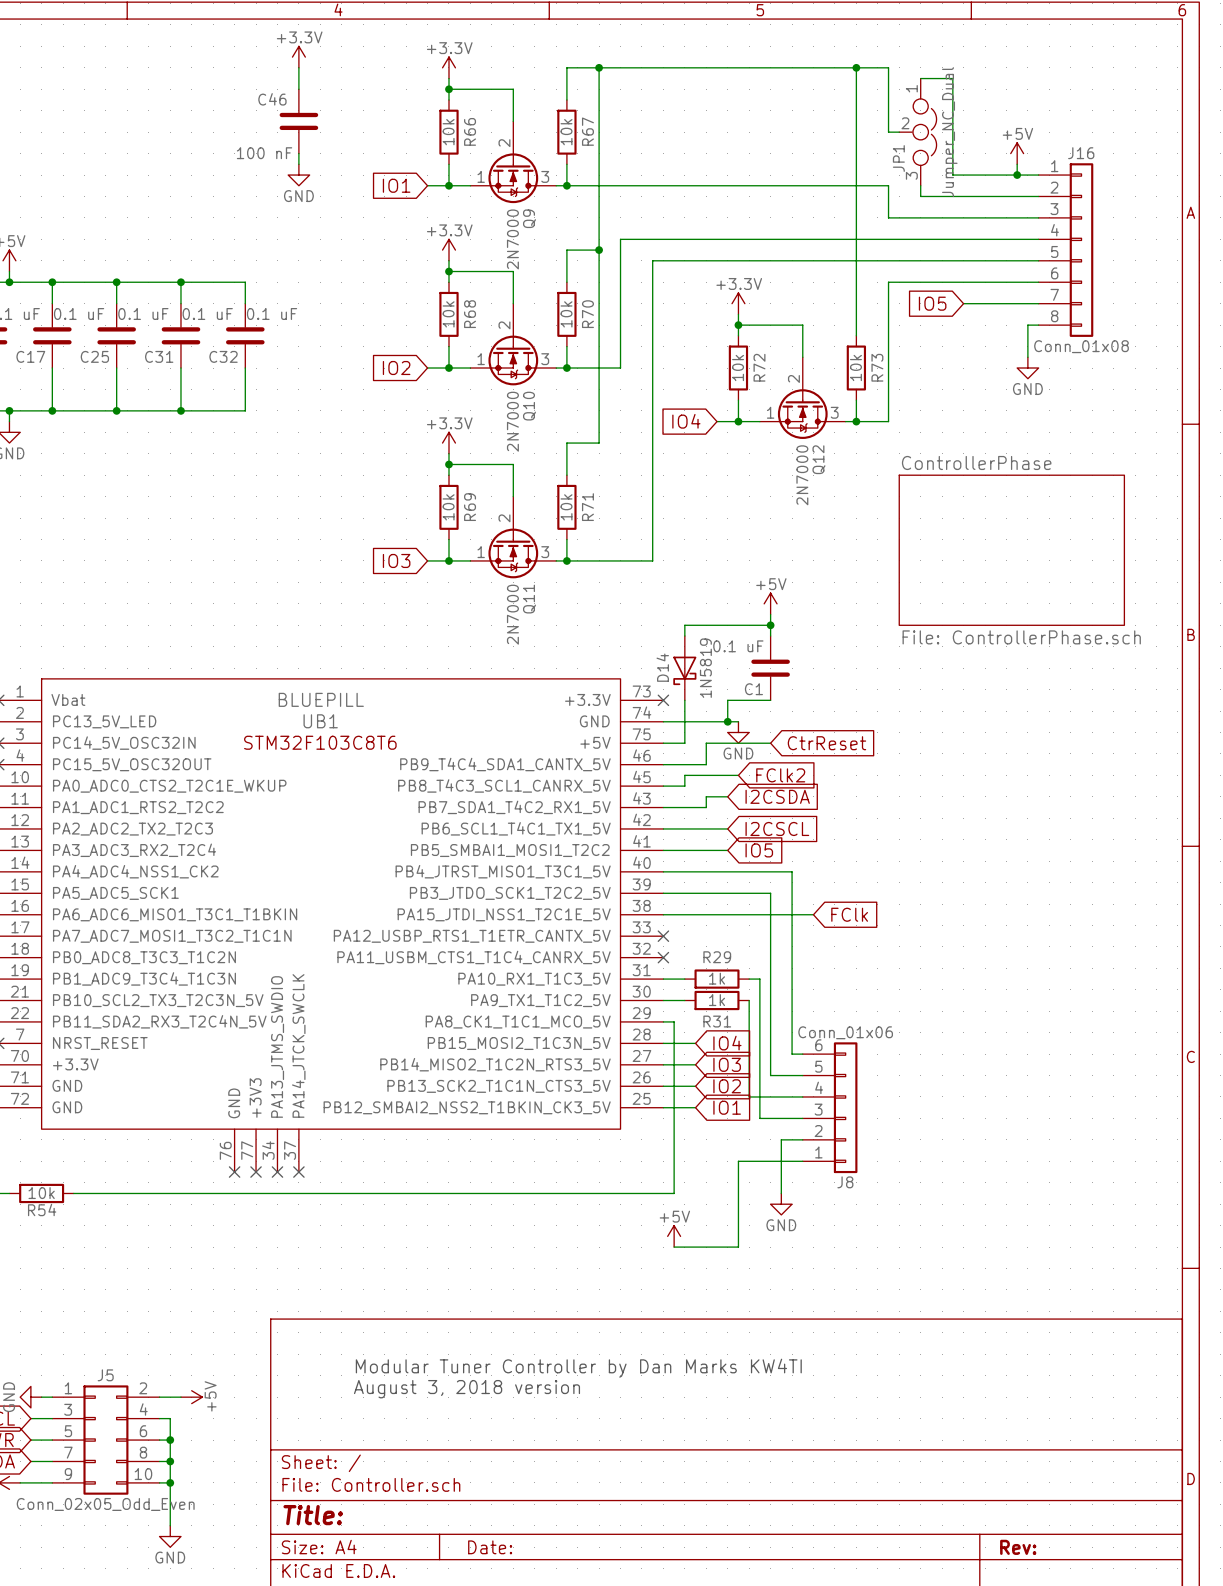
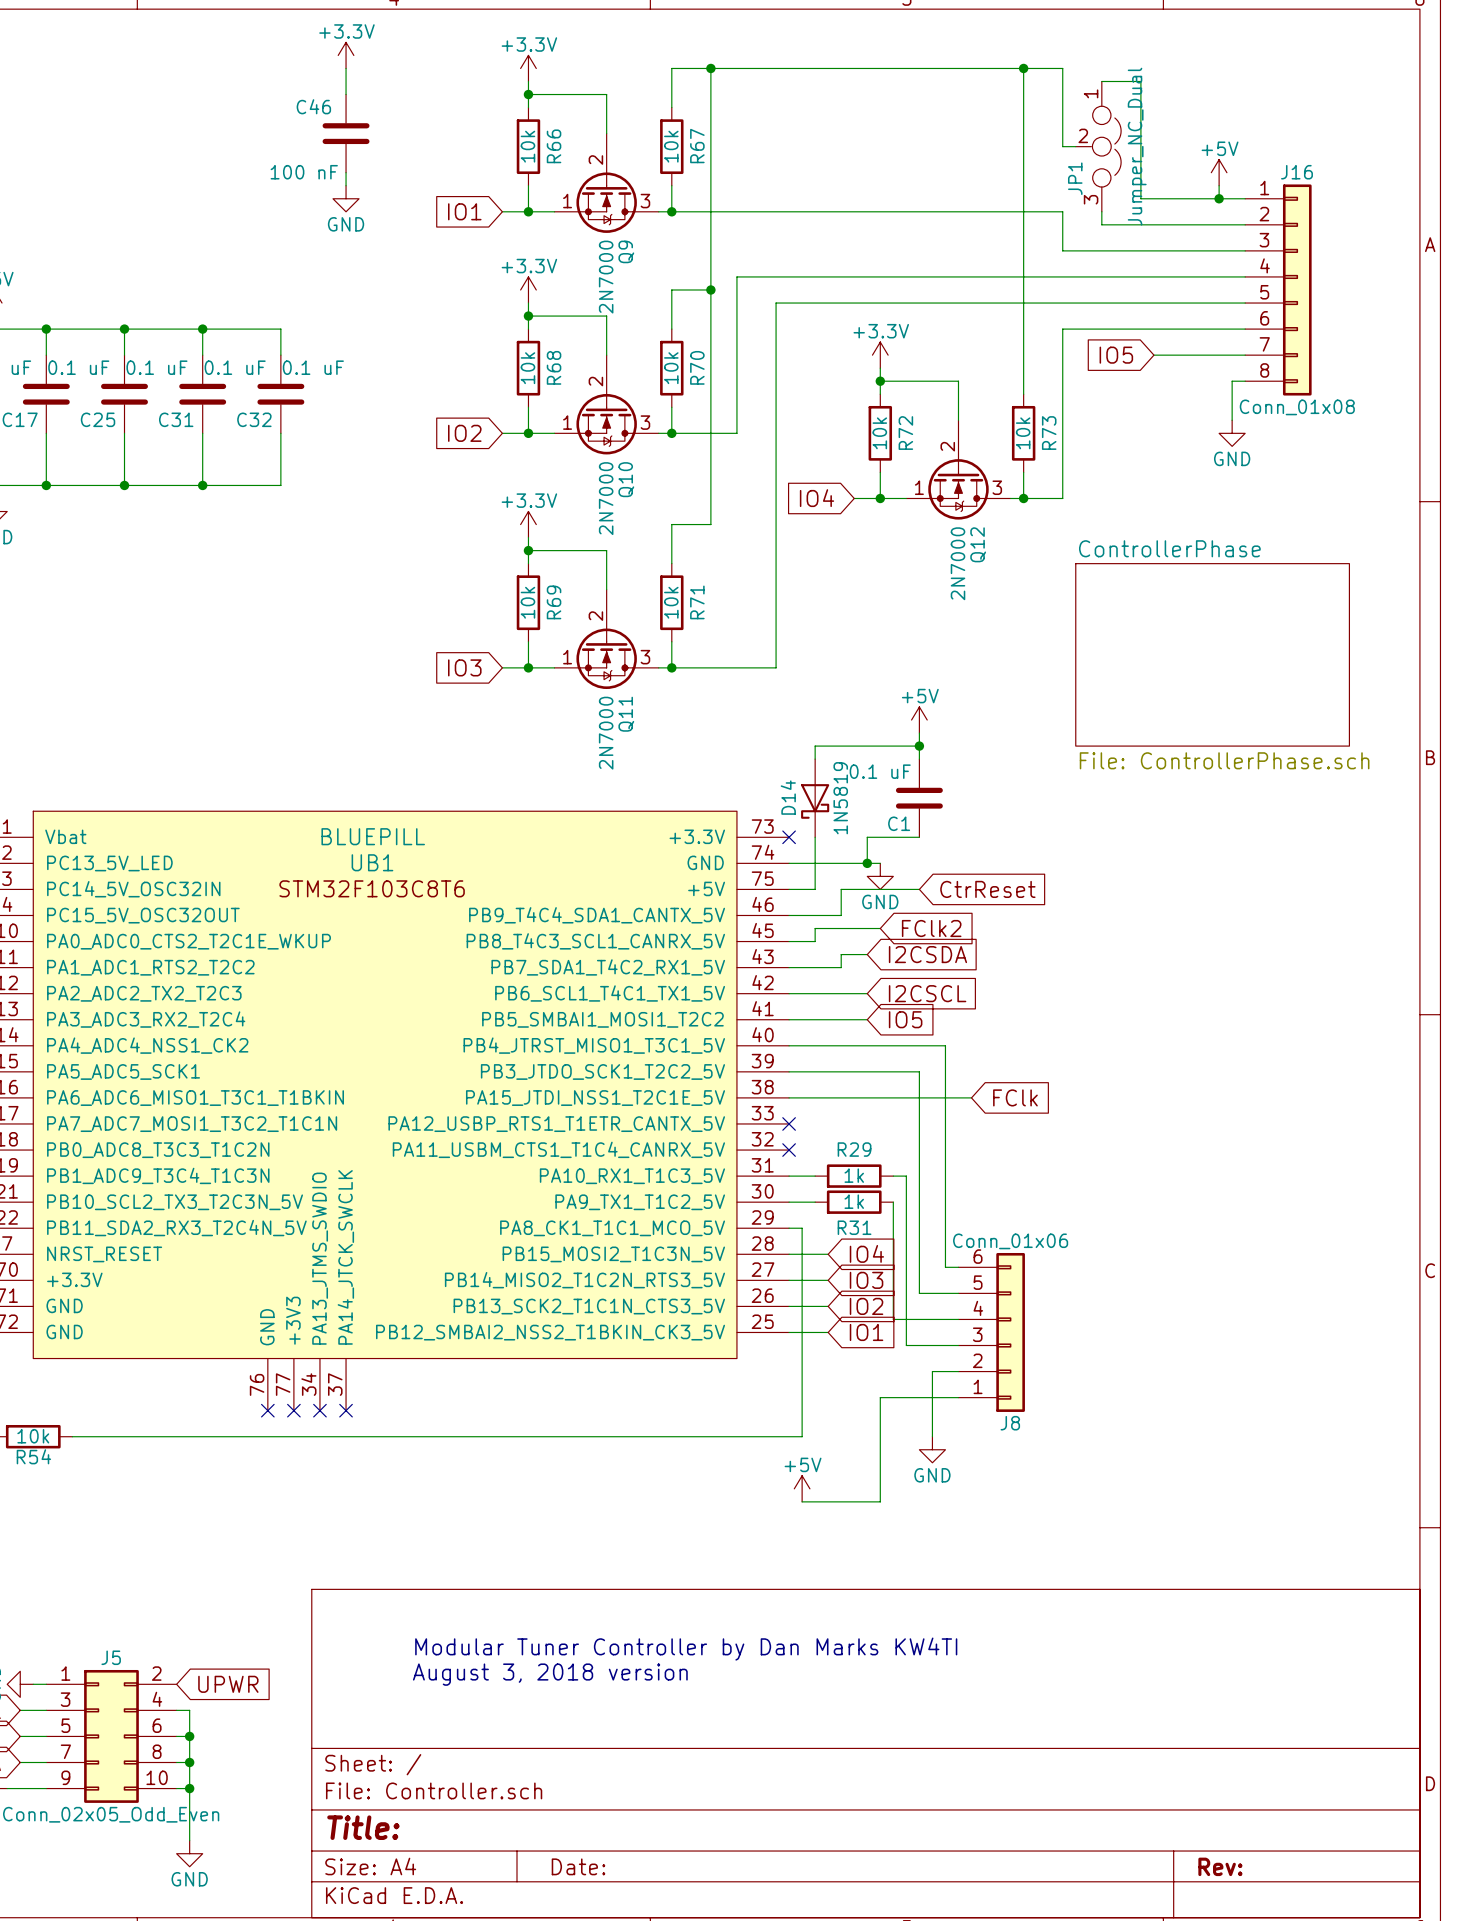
wire: (159, 1397) (180, 1397) -> none
power symbol: +5V (191, 1397) -> none
global label: none -> UPWR (228, 1684)

